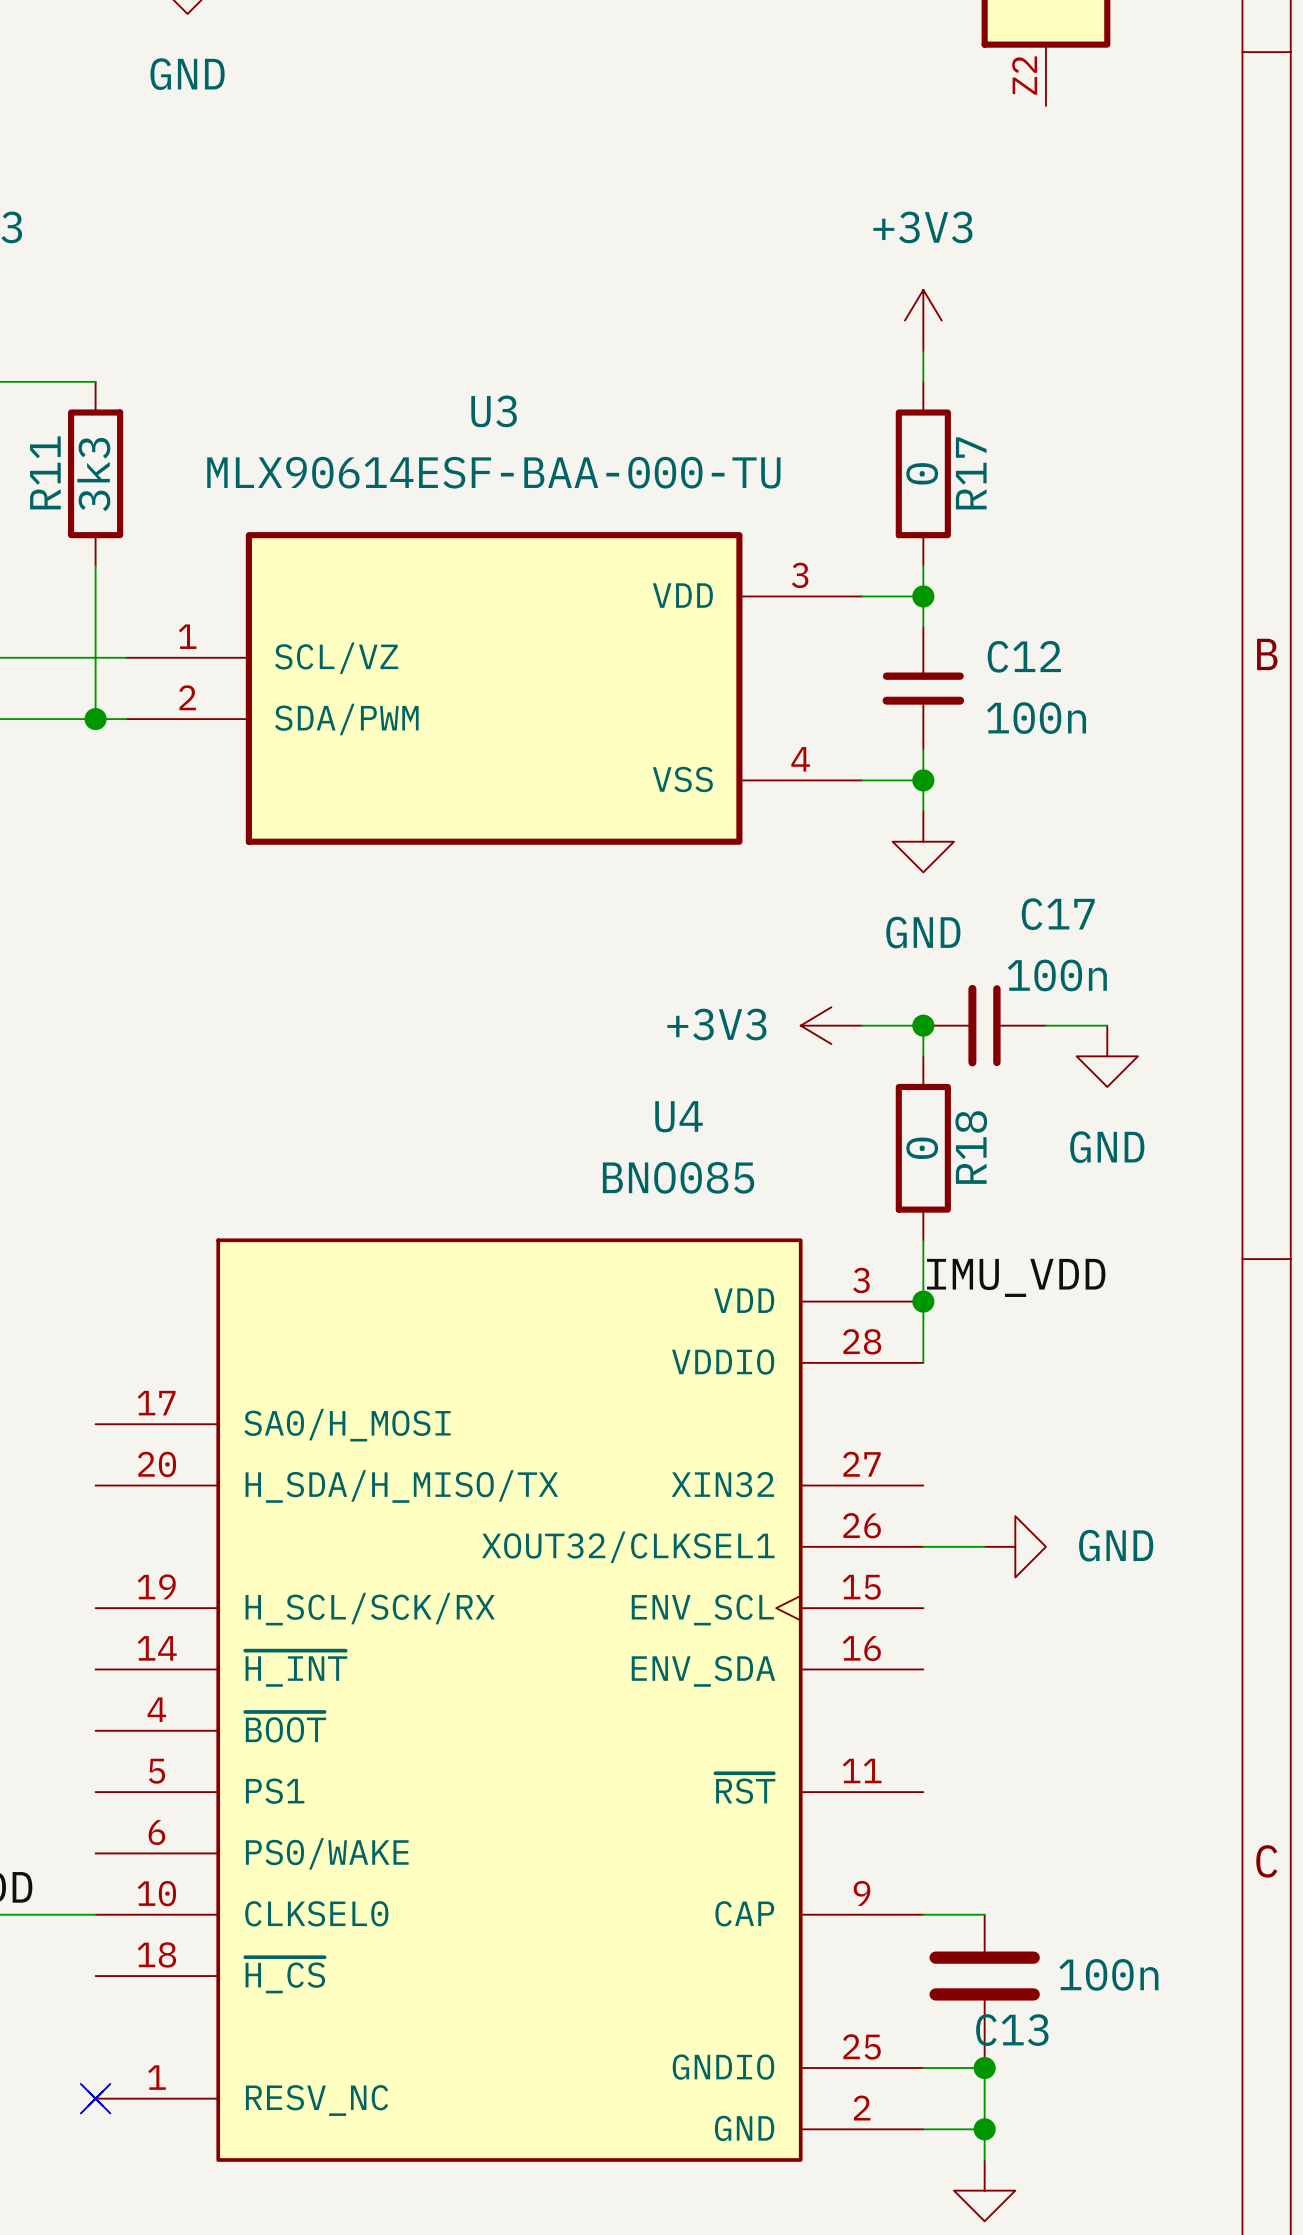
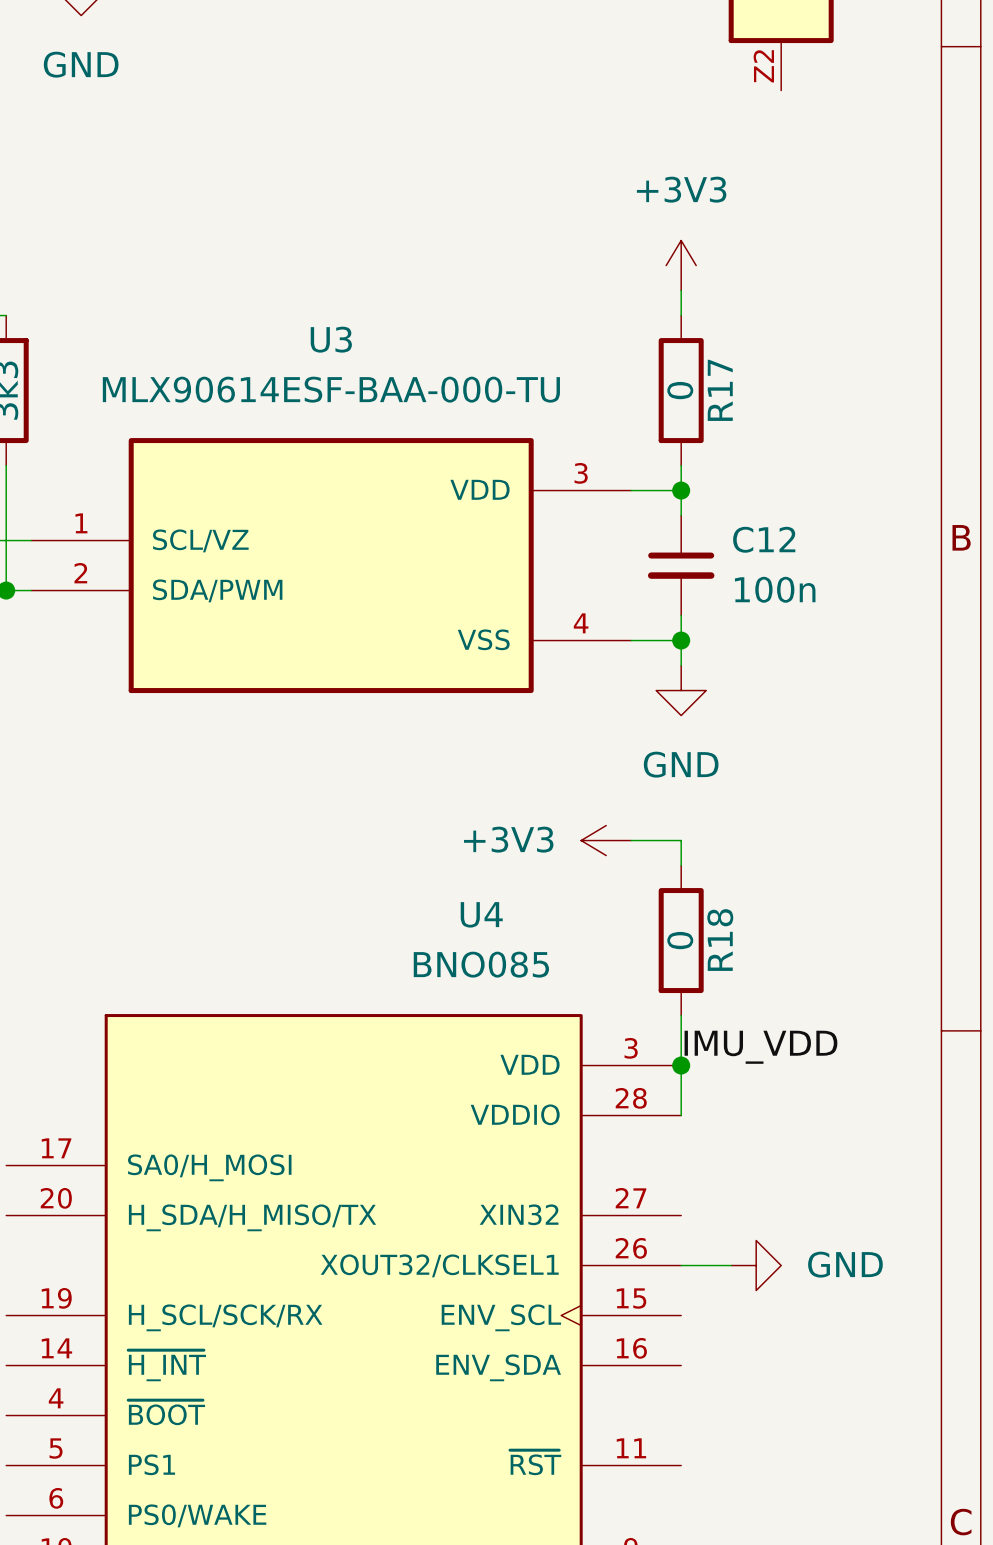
junction: (923, 1025) -> none
C17: 100n (984, 1025) -> none
wire: (1045, 1025) (1107, 1025) -> none
power symbol: GND (1107, 1056) -> none

